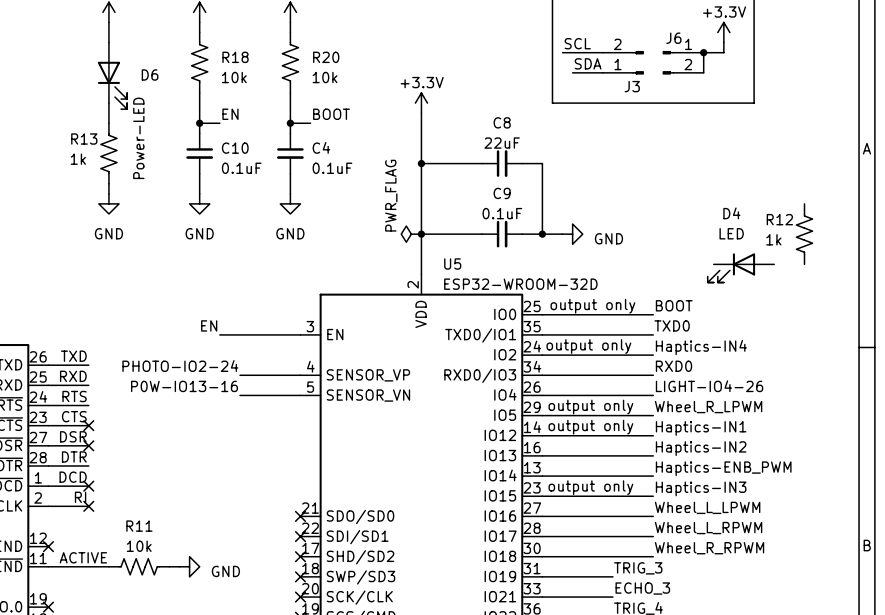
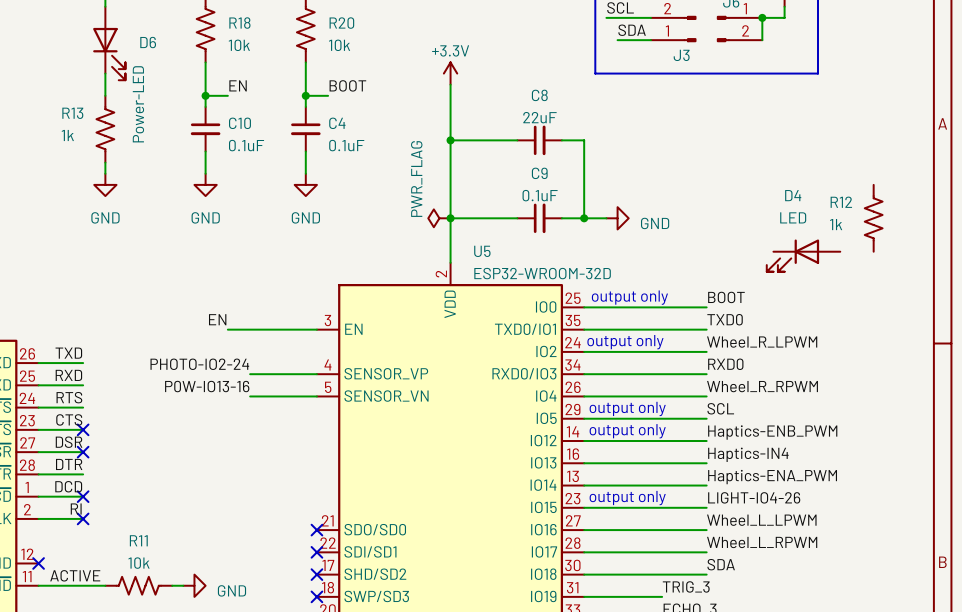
label: Haptics-IN4 (701, 347) -> Wheel_R_LPWM (762, 342)
label: LIGHT-IO4-26 (709, 386) -> Wheel_R_RPWM (762, 386)
label: Wheel_R_LPWM (708, 407) -> SCL (720, 408)
label: Haptics-IN1 (701, 428) -> Haptics-ENB_PWM (772, 432)
label: Haptics-IN2 (701, 448) -> Haptics-IN4 (748, 454)
label: Haptics-ENB_PWM (723, 468) -> Haptics-ENA_PWM (772, 477)
label: Haptics-IN3 (701, 488) -> LIGHT-IO4-26 (754, 497)
label: Wheel_R_RPWM (709, 548) -> SDA (721, 564)

